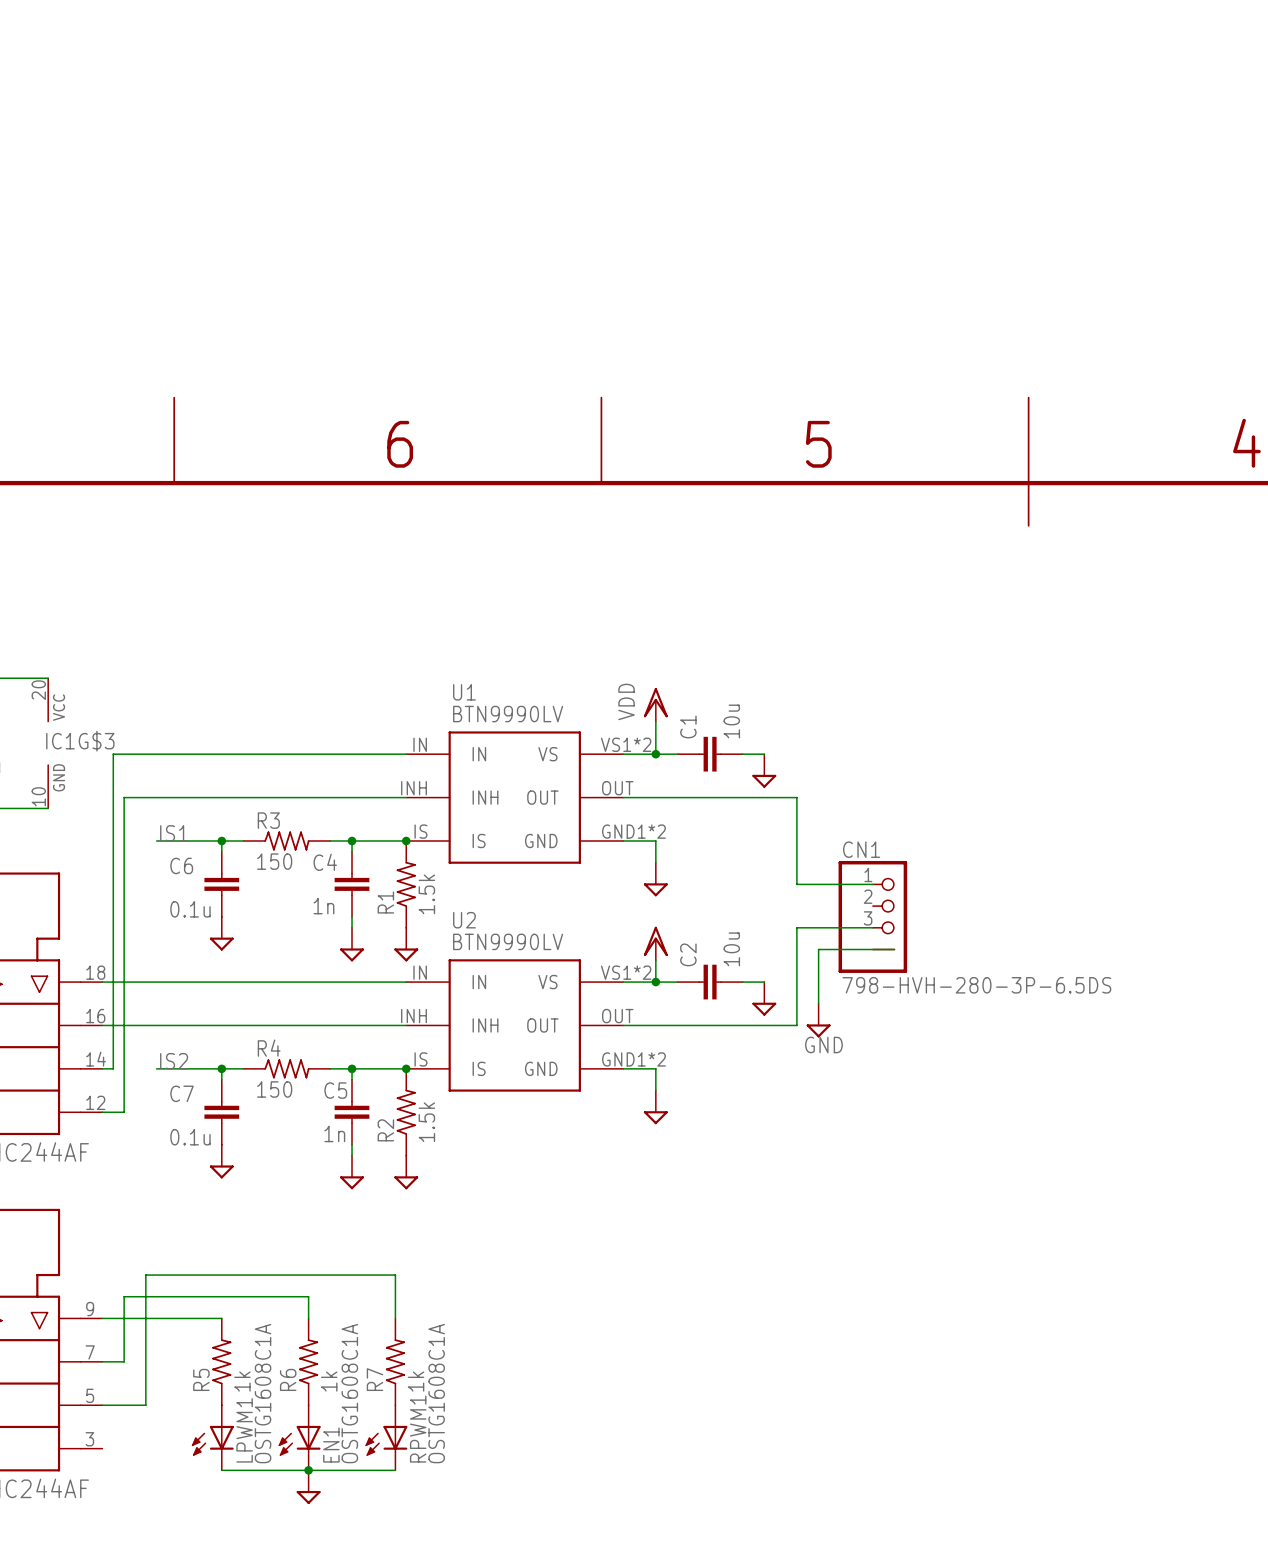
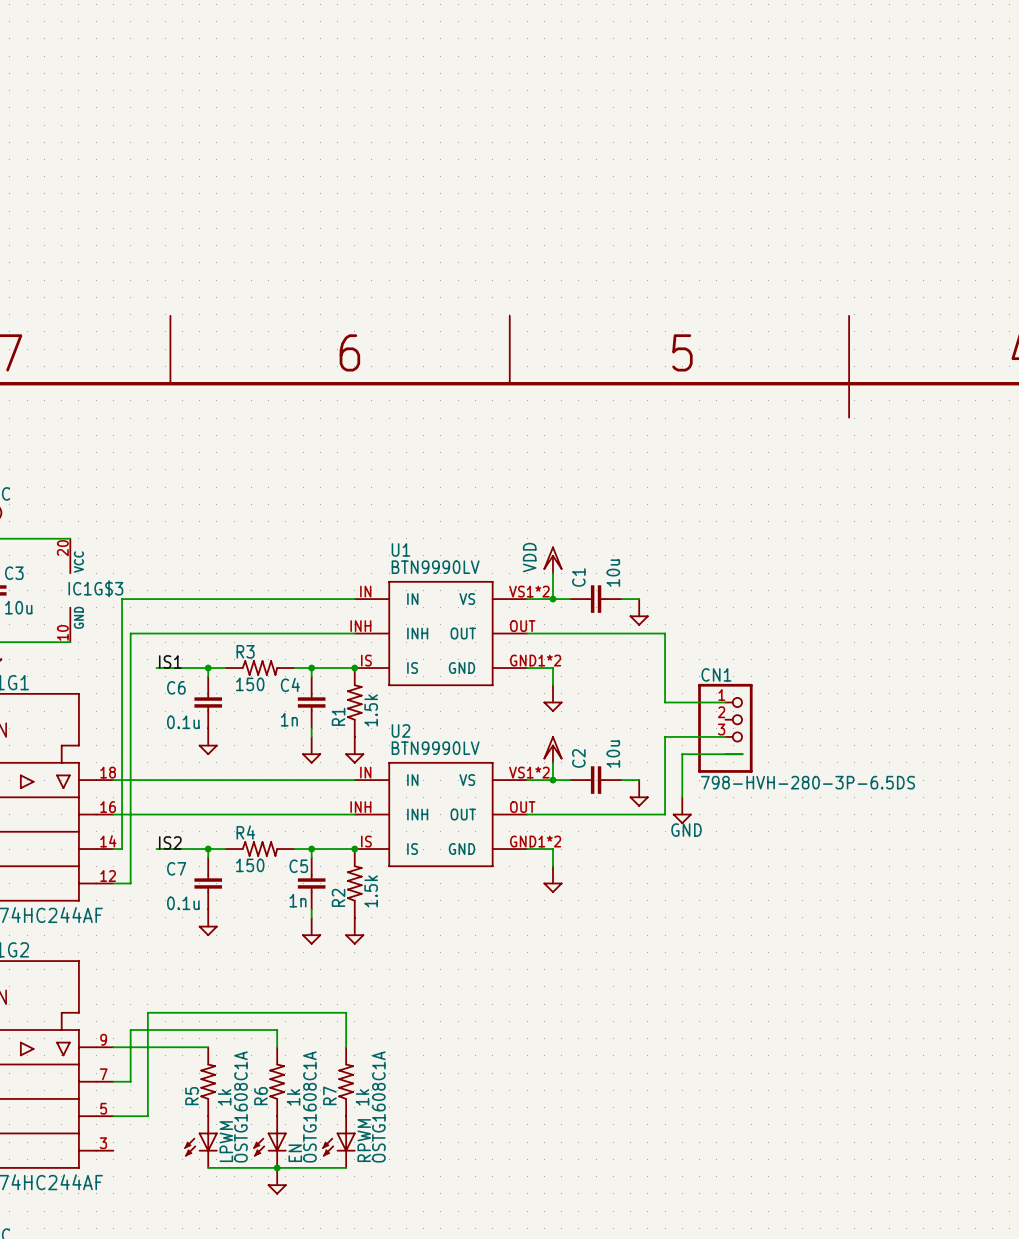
RPWM1 name: RPWM1 (418, 1429) -> RPWM (364, 1140)
LPWM1 name: LPWM1 (244, 1430) -> LPWM (226, 1141)
EN1 name: EN1 (331, 1445) -> EN (295, 1153)

